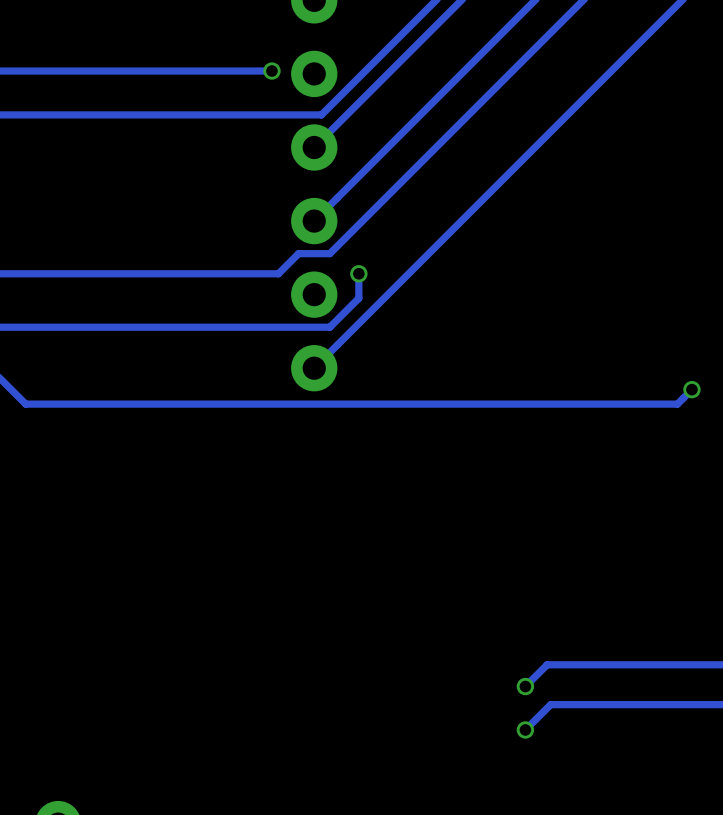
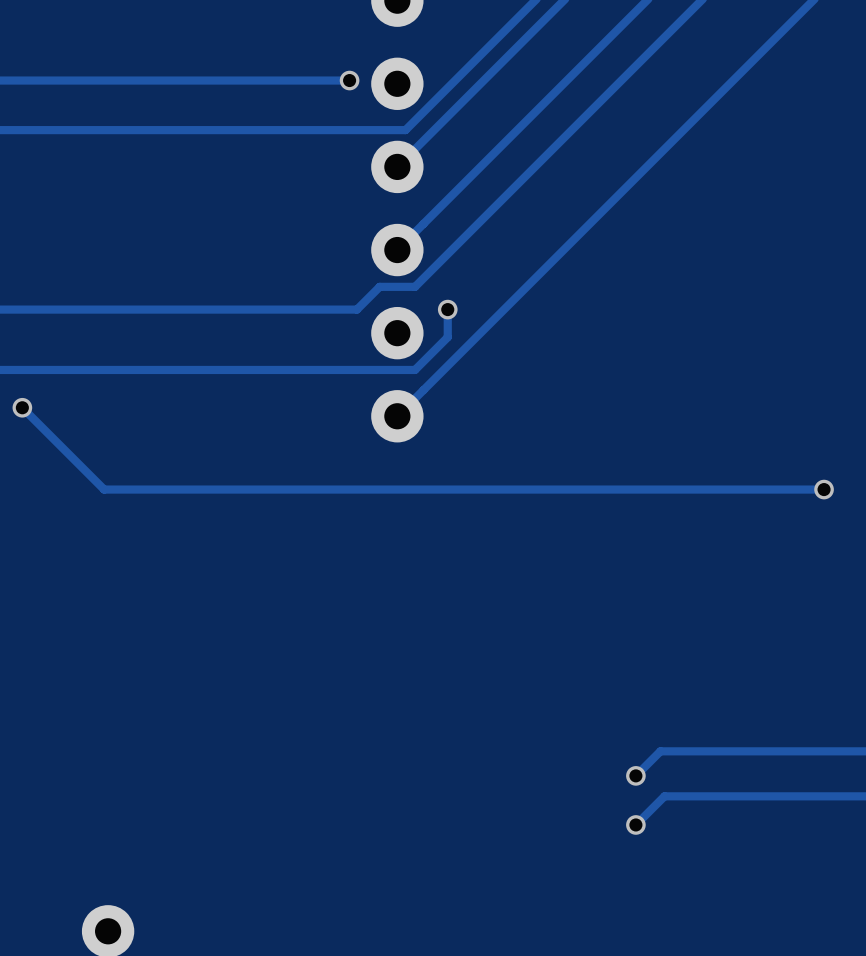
track: (691, 389) (677, 404) (25, 404) -> (824, 489) (104, 489) (71, 456)
via position: (691, 389) -> (824, 489)

